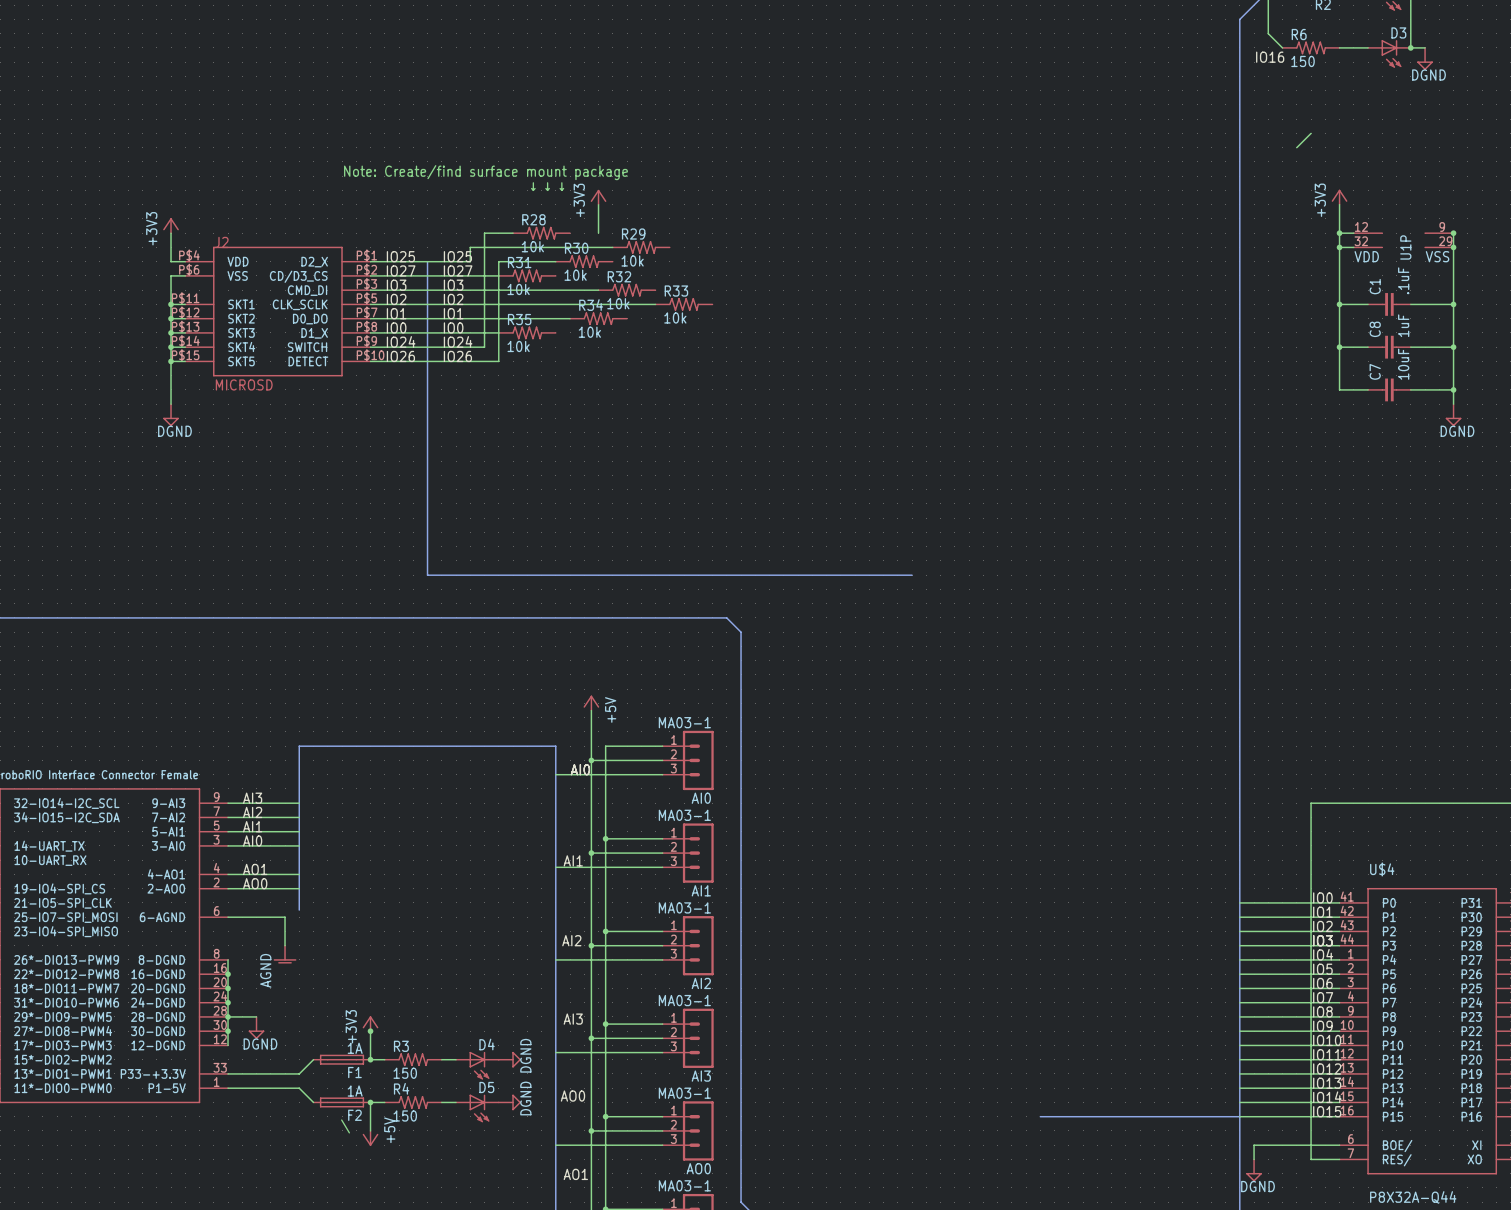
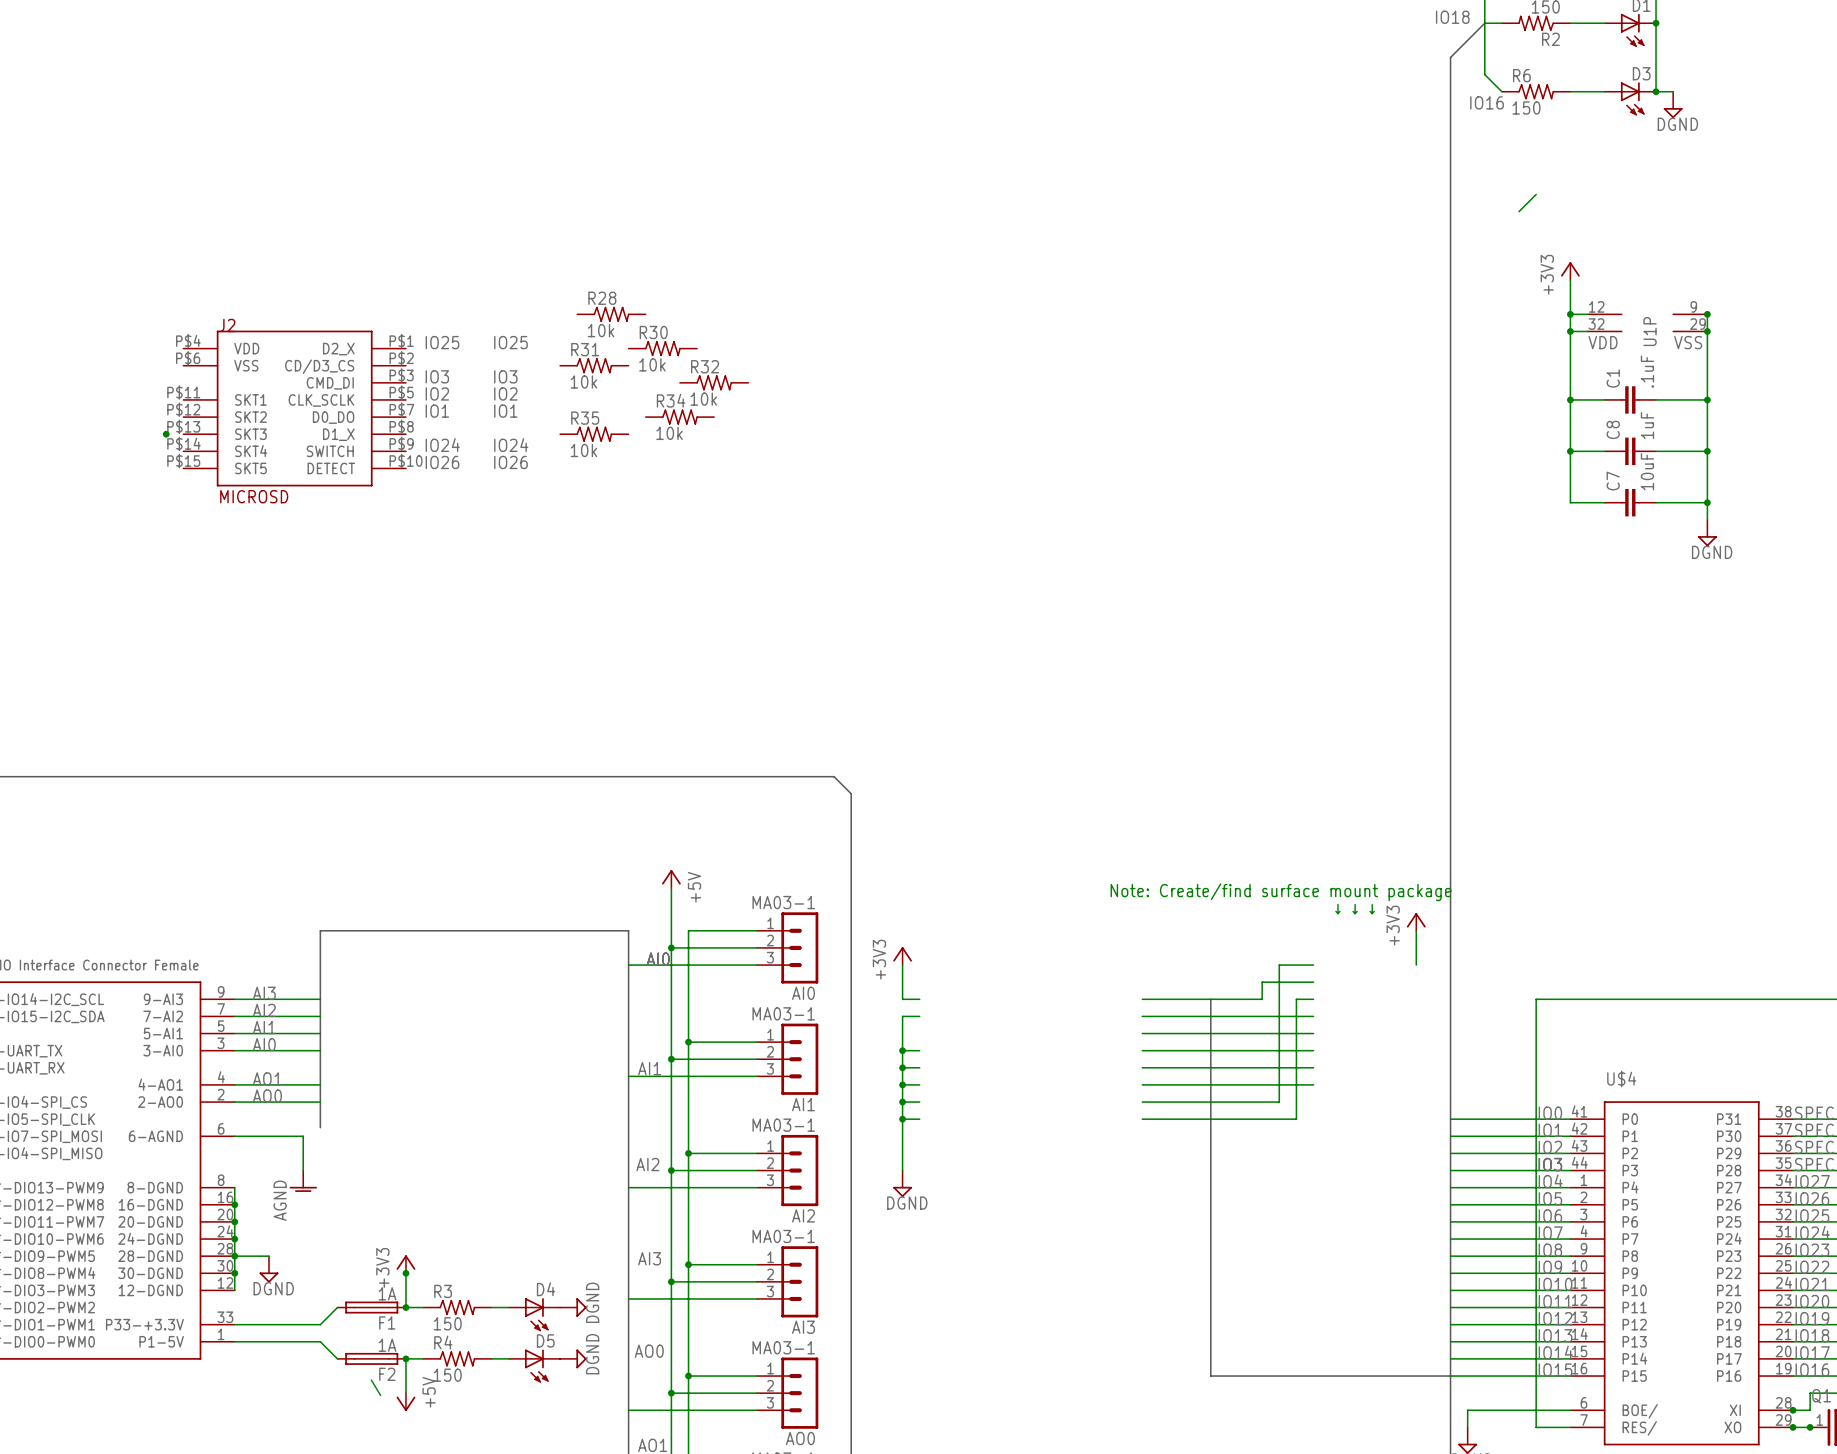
text: Note: Create/find surface mount package (485, 172) -> none
text: ↓ (533, 186) -> none
text: ↓ (547, 186) -> none
text: ↓ (561, 186) -> none
power symbol: +3V3 (598, 197) -> none
wire: (598, 204) (598, 233) -> none
power symbol: +3V3 (171, 225) -> none
wire: (171, 233) (171, 261) (185, 261) -> none
wire: (513, 233) (484, 233) (484, 347) (370, 347) -> none
wire: (612, 247) (470, 247) (470, 261) (370, 261) -> none
R29: 10k (641, 247) -> none
bus: (427, 261) (427, 575) (912, 575) -> none
wire: (555, 261) (498, 261) (498, 361) (370, 361) -> none
label: IO27 (401, 270) -> none
label: IO27 (458, 270) -> none
wire: (185, 275) (171, 275) (171, 404) -> none
wire: (370, 275) (498, 275) -> none
wire: (370, 290) (598, 290) -> none
wire: (171, 304) (185, 304) -> none
junction: (171, 304) -> none
wire: (370, 304) (655, 304) -> none
R33: 10k (684, 304) -> none
wire: (171, 318) (185, 318) -> none
junction: (171, 318) -> none
wire: (370, 318) (570, 318) -> none
label: IO0 (396, 327) -> none
label: IO0 (453, 327) -> none
wire: (171, 332) (185, 332) -> none
wire: (370, 332) (498, 332) -> none
wire: (171, 347) (185, 347) -> none
junction: (171, 347) -> none
wire: (171, 361) (185, 361) -> none
junction: (171, 361) -> none
power symbol: DGND (171, 415) -> none
text: none -> Note: Create/find surface mount package (1281, 892)
text: none -> ↓ (1337, 909)
text: none -> ↓ (1355, 909)
text: none -> ↓ (1372, 909)
power symbol: none -> +3V3 (1416, 921)
wire: none -> (1416, 930) (1416, 965)
power symbol: none -> +3V3 (902, 956)
wire: none -> (902, 965) (902, 999) (919, 999)
wire: none -> (1313, 965) (1279, 965) (1279, 1102) (1142, 1102)
wire: none -> (1313, 982) (1262, 982) (1262, 999) (1142, 999)
bus: none -> (1210, 999) (1210, 1376)
wire: none -> (1313, 999) (1296, 999) (1296, 1119) (1142, 1119)
wire: none -> (919, 1016) (902, 1016) (902, 1170)
wire: none -> (1142, 1016) (1313, 1016)
wire: none -> (1142, 1033) (1313, 1033)
wire: none -> (902, 1050) (919, 1050)
junction: none -> (902, 1050)
wire: none -> (1142, 1050) (1313, 1050)
wire: none -> (902, 1067) (919, 1067)
junction: none -> (902, 1067)
wire: none -> (1142, 1067) (1313, 1067)
wire: none -> (902, 1084) (919, 1084)
junction: none -> (902, 1084)
wire: none -> (1142, 1084) (1313, 1084)
wire: none -> (902, 1102) (919, 1102)
junction: none -> (902, 1102)
wire: none -> (902, 1119) (919, 1119)
junction: none -> (902, 1119)
power symbol: none -> DGND (902, 1183)

